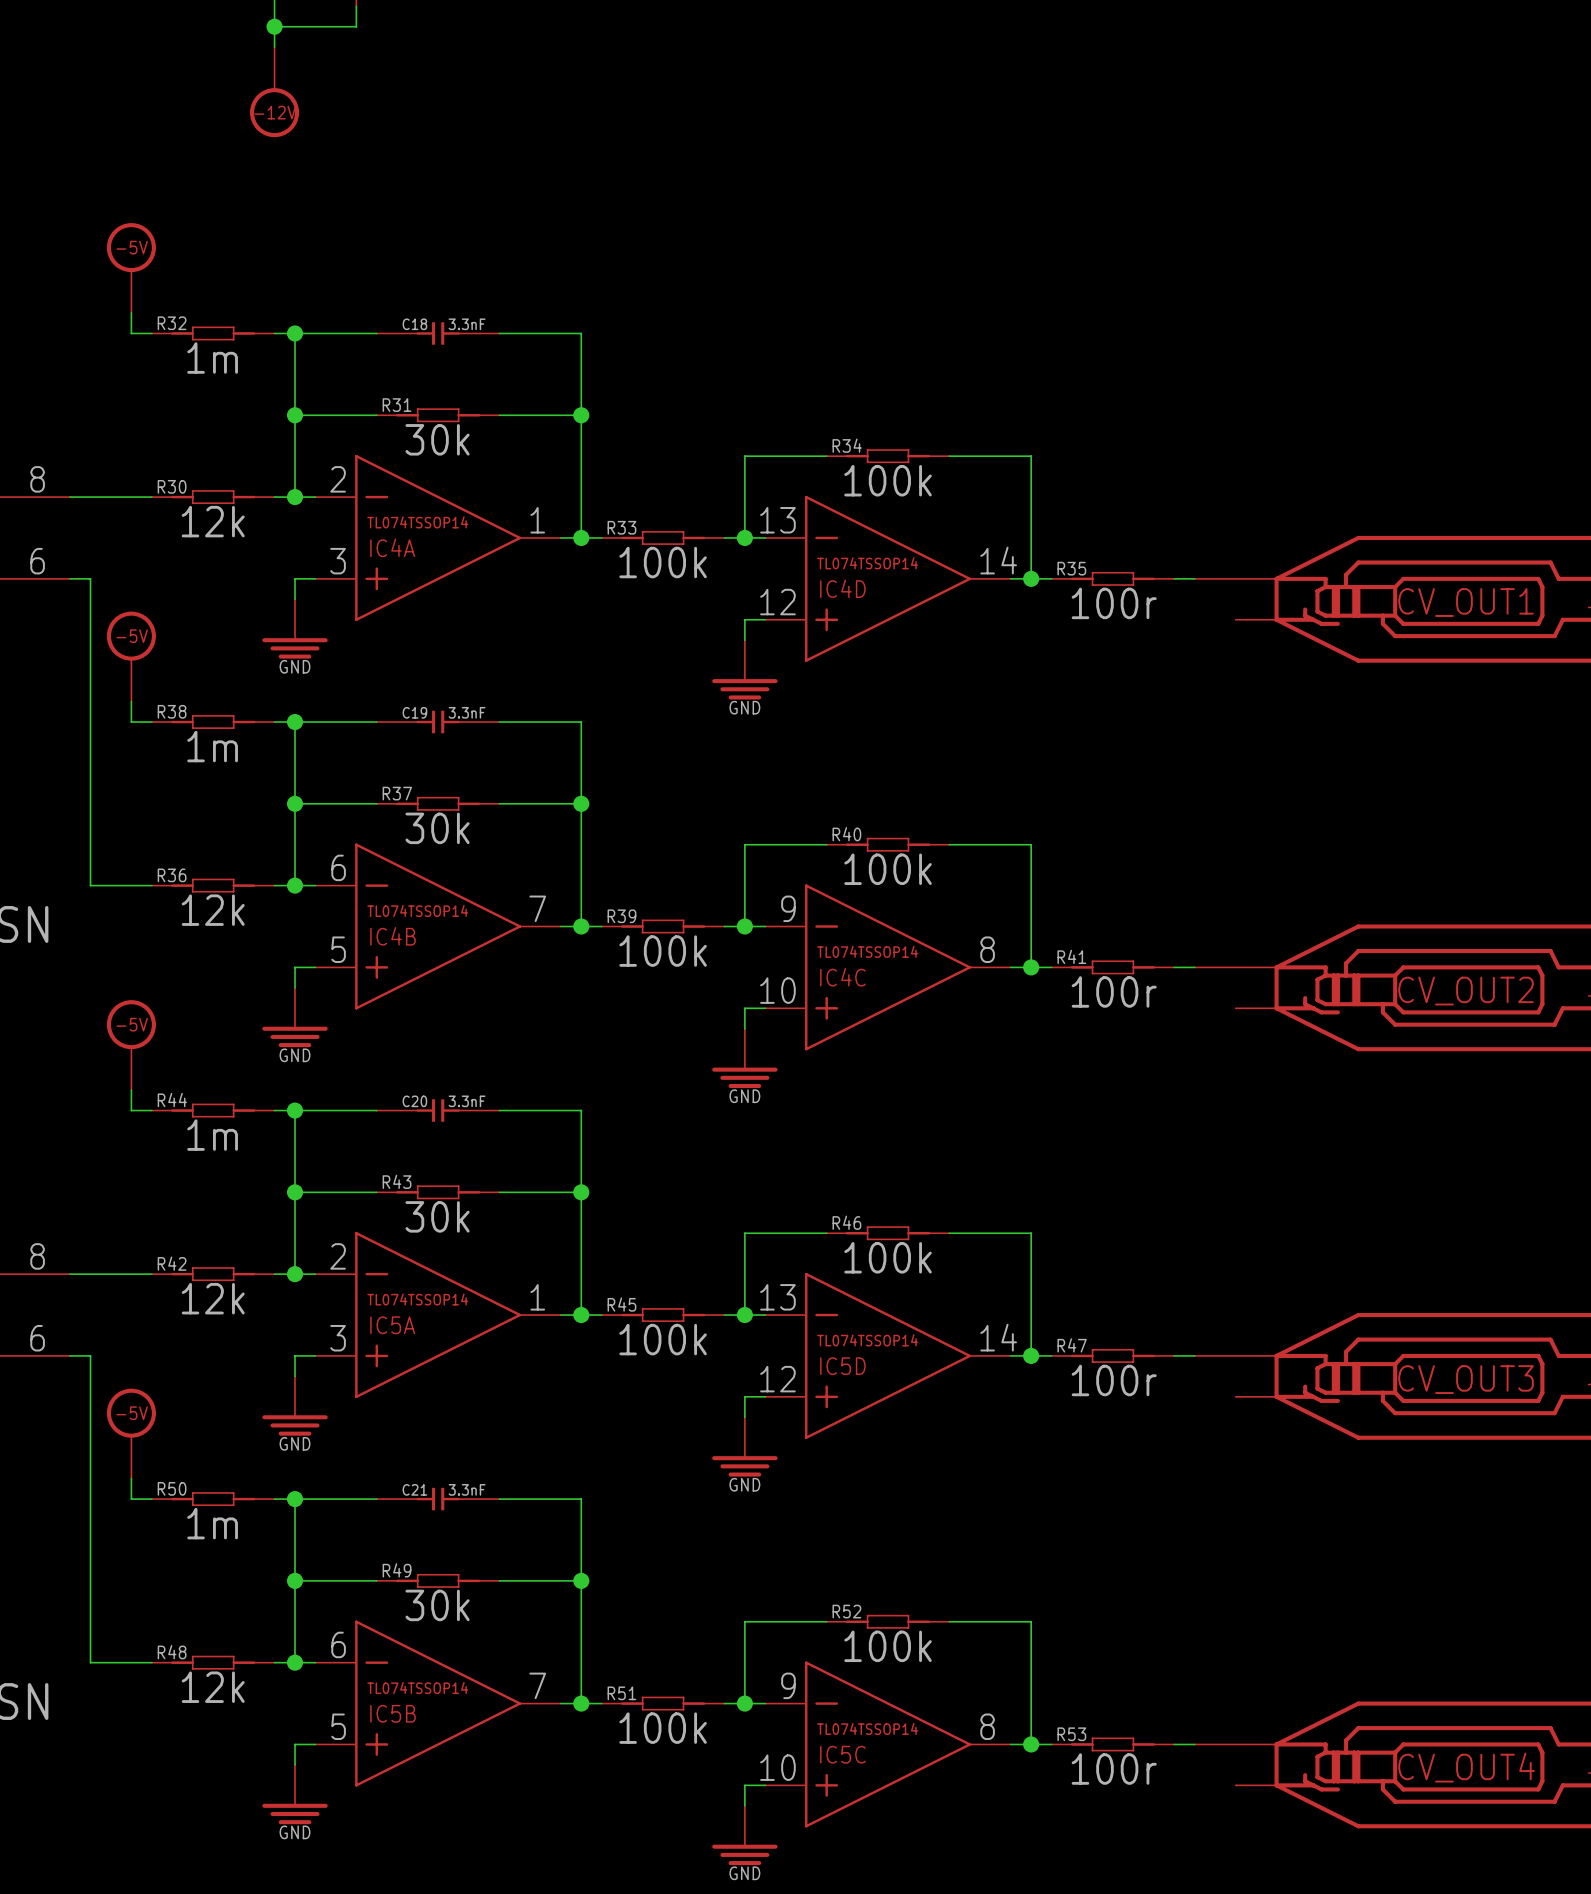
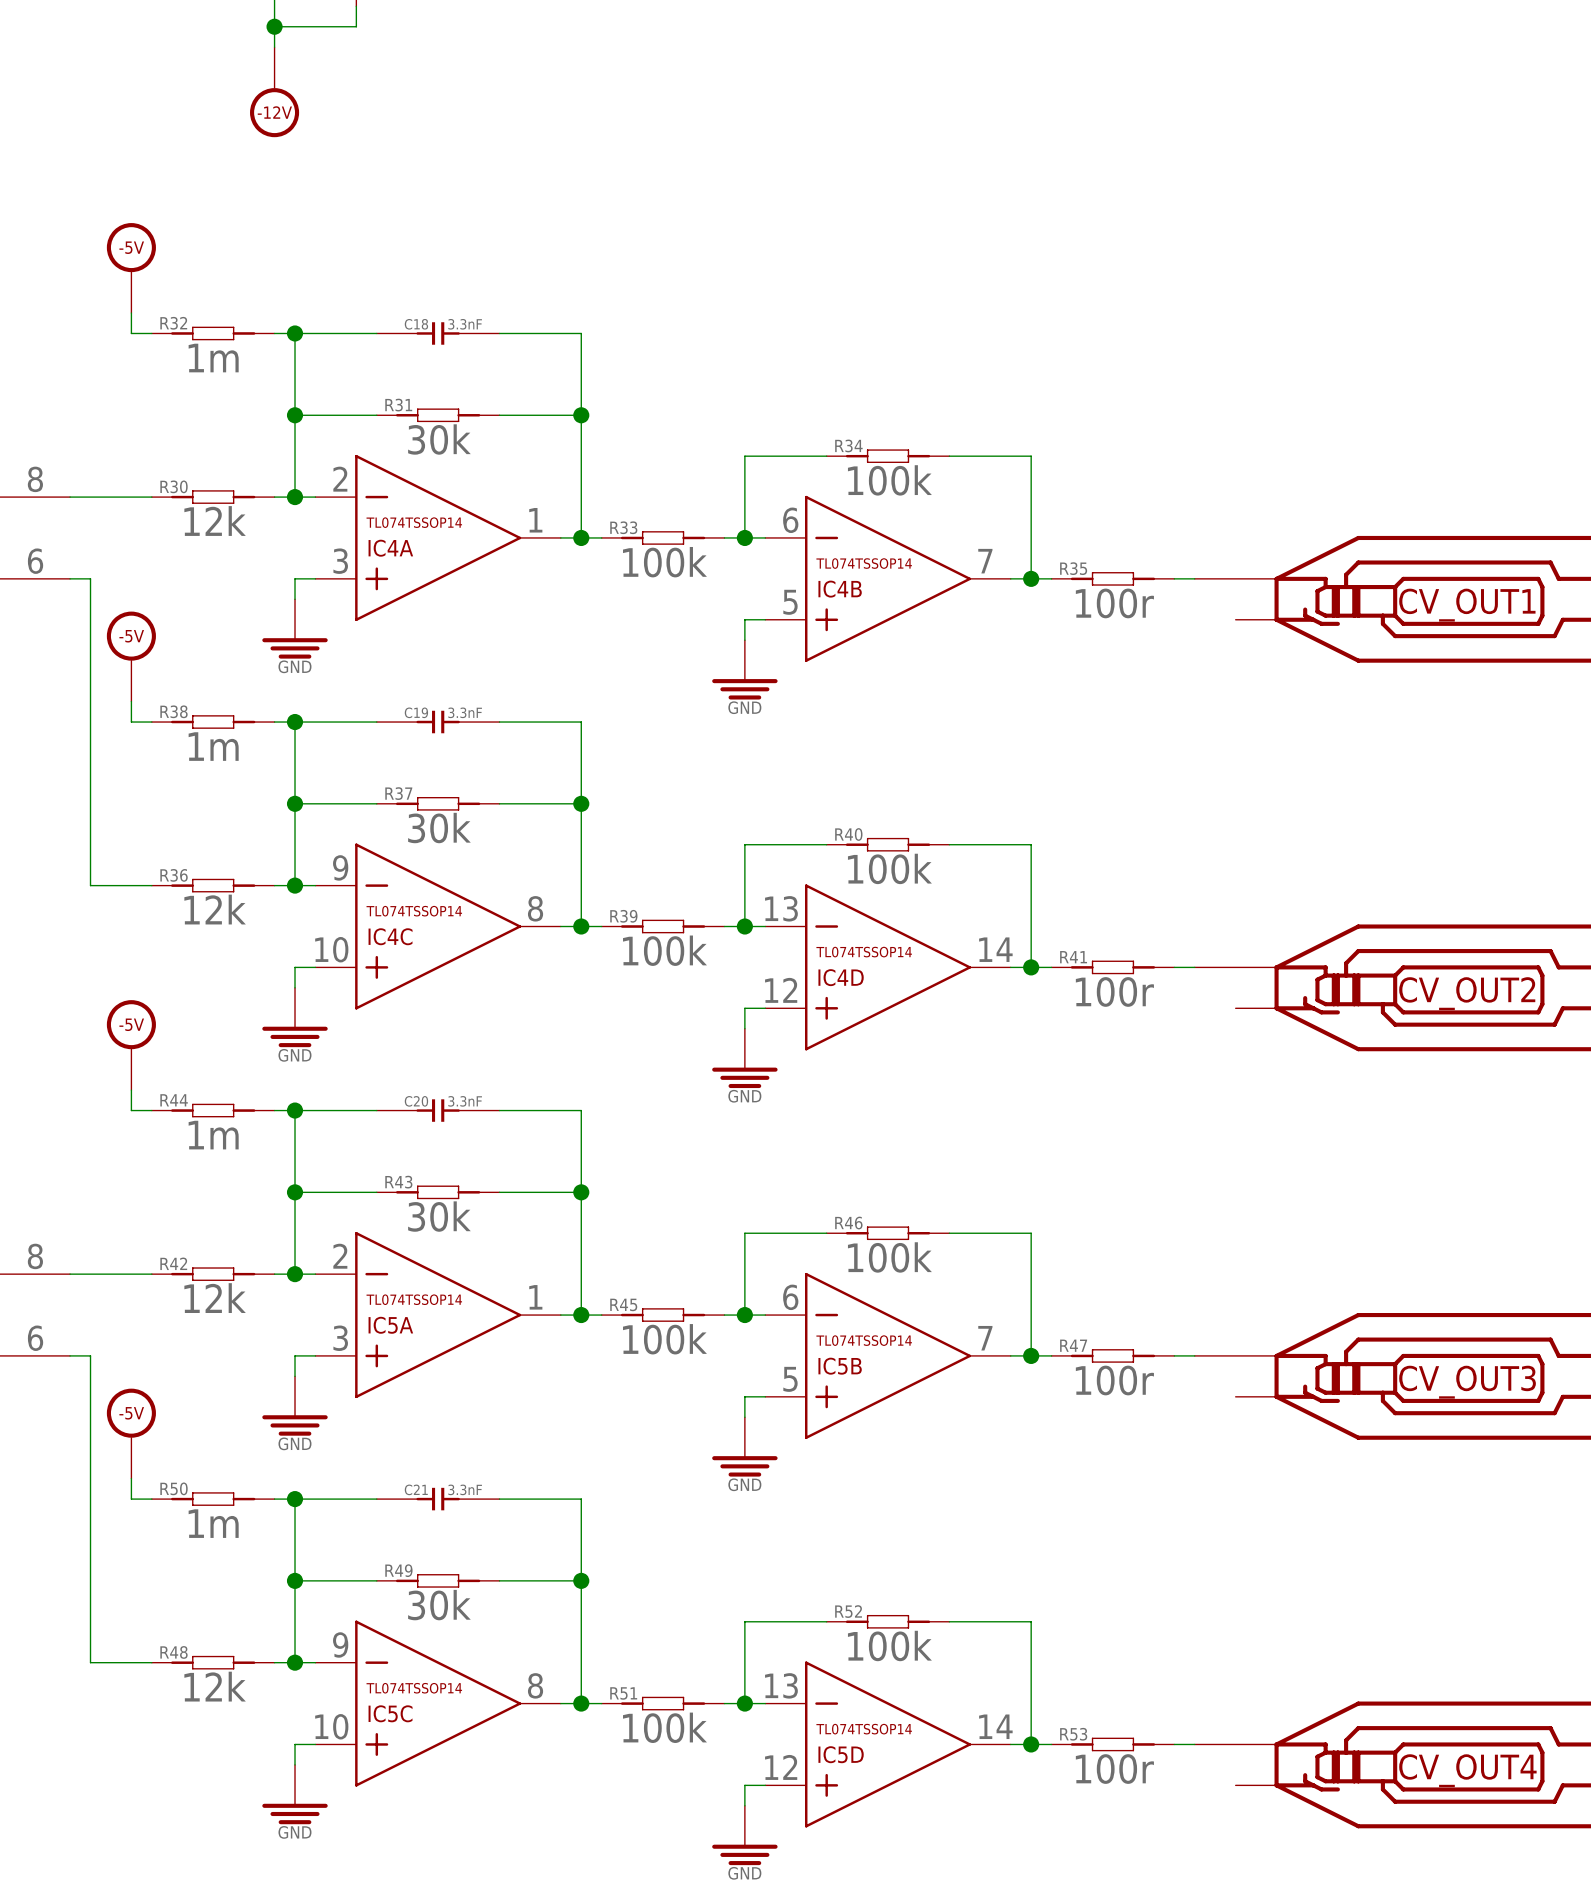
IC4D position: (888, 578) -> (888, 967)
IC4B position: (438, 926) -> (888, 578)
IC4C position: (888, 967) -> (438, 926)
IC5D position: (888, 1355) -> (888, 1744)
IC5B position: (438, 1703) -> (888, 1355)
IC5C position: (888, 1744) -> (438, 1703)

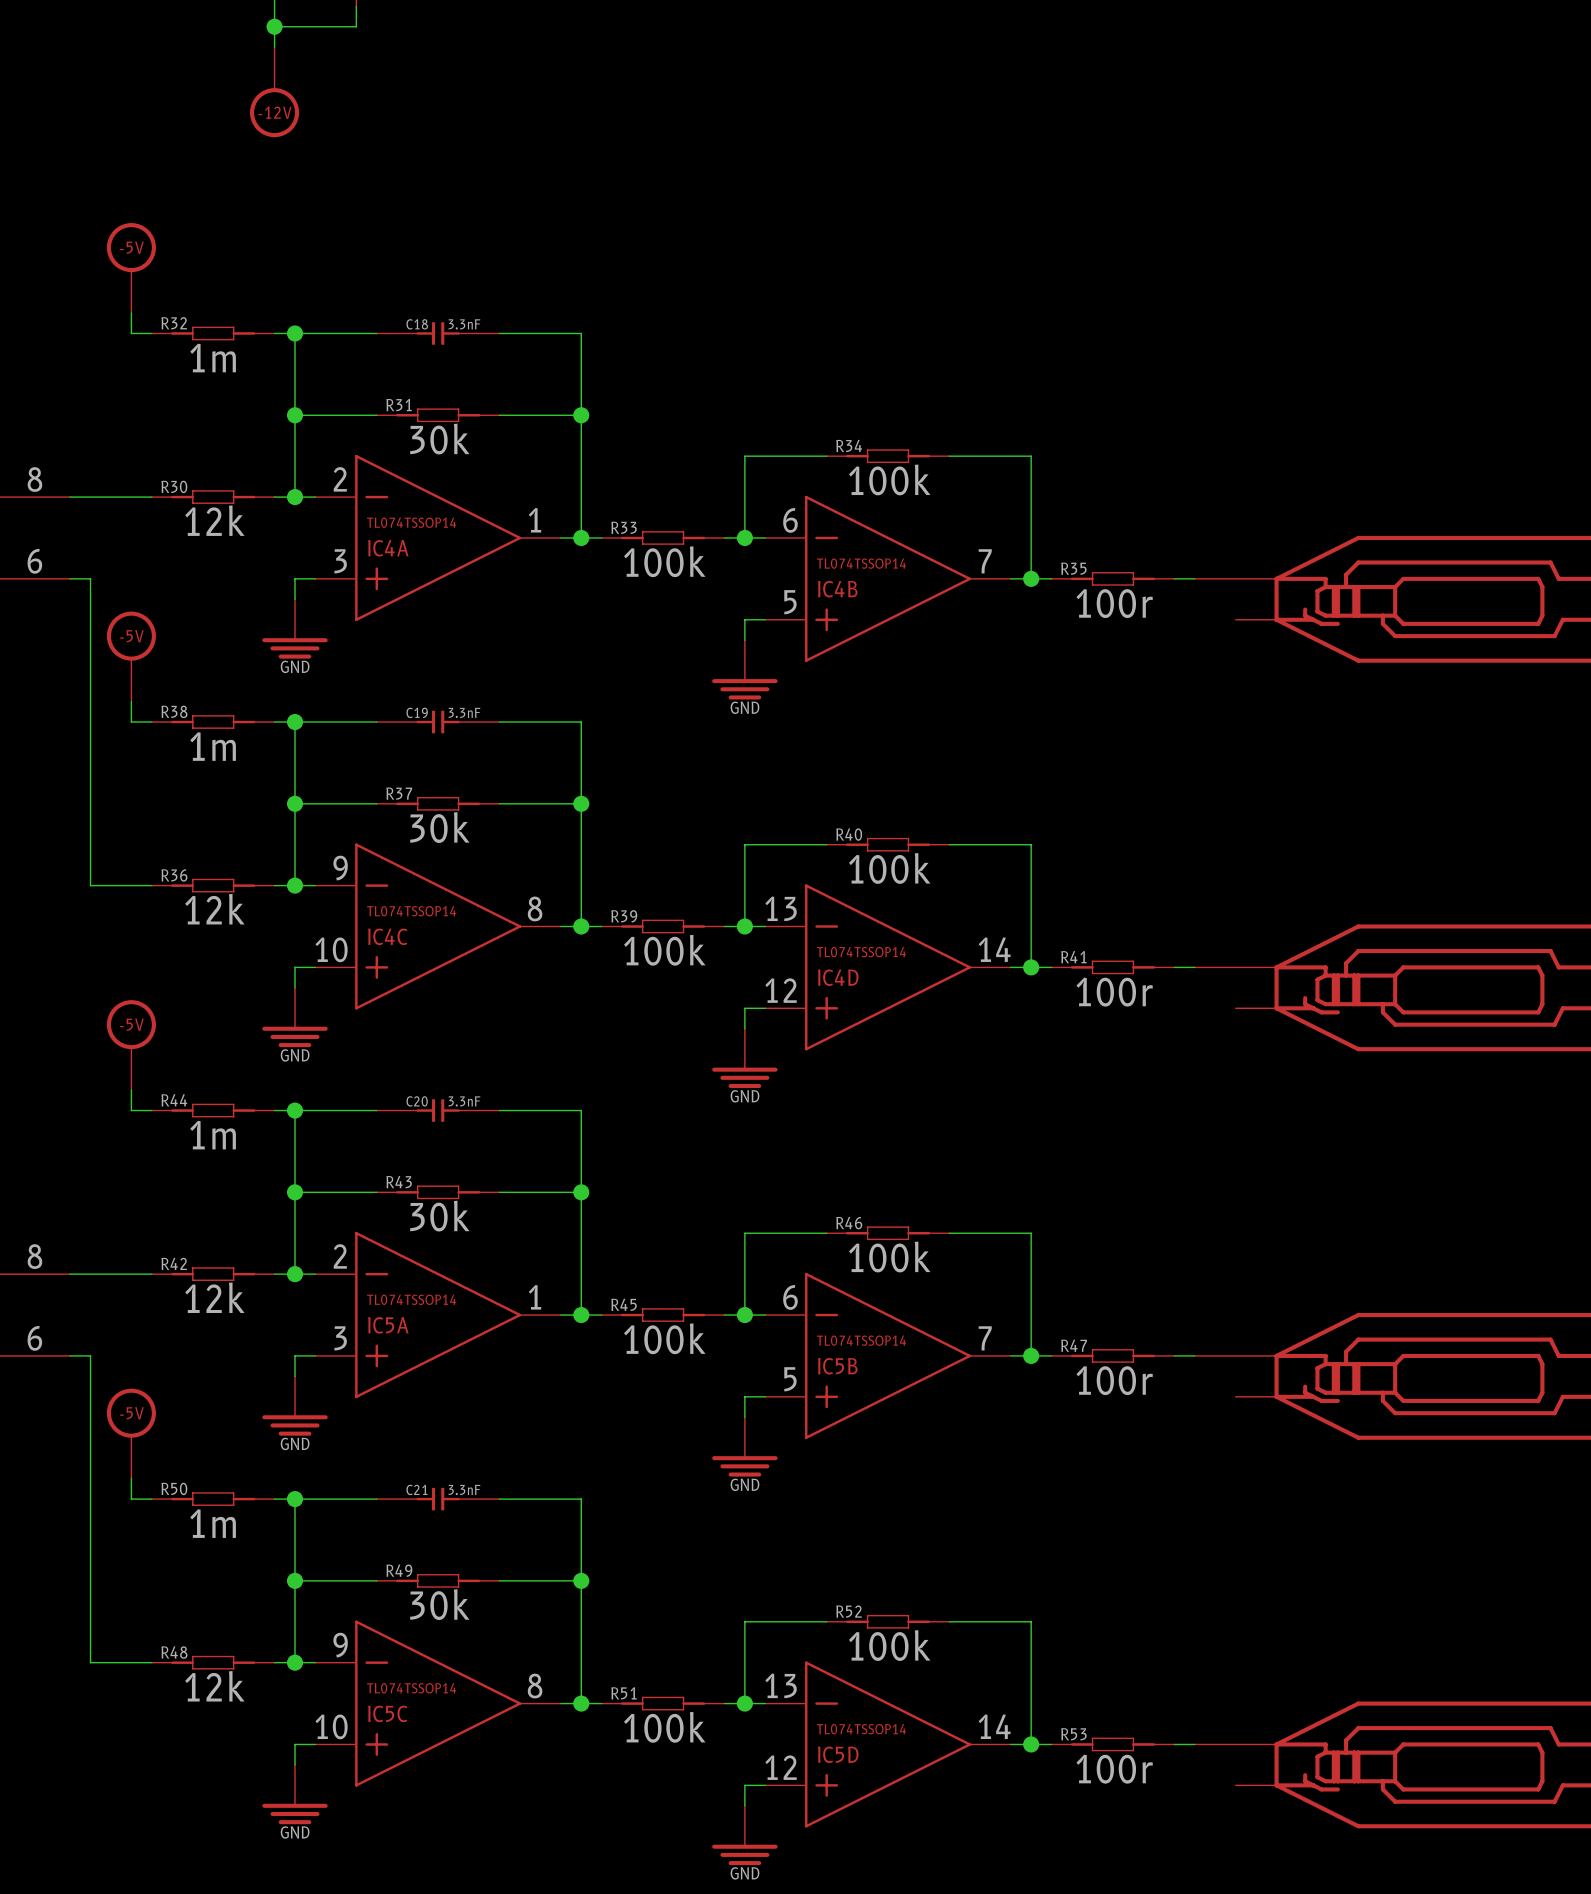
part text: CV_OUT1 (1467, 605) -> none
part text: CV_OUT2 (1467, 993) -> none
part text: CV_OUT3 (1467, 1382) -> none
part text: CV_OUT4 (1467, 1770) -> none

